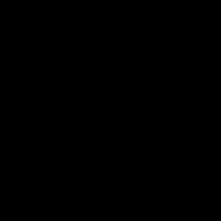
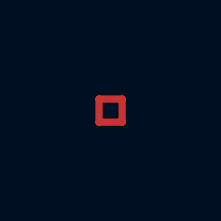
track: none -> (99, 99) (122, 99) (122, 122) (99, 122) (99, 99)

